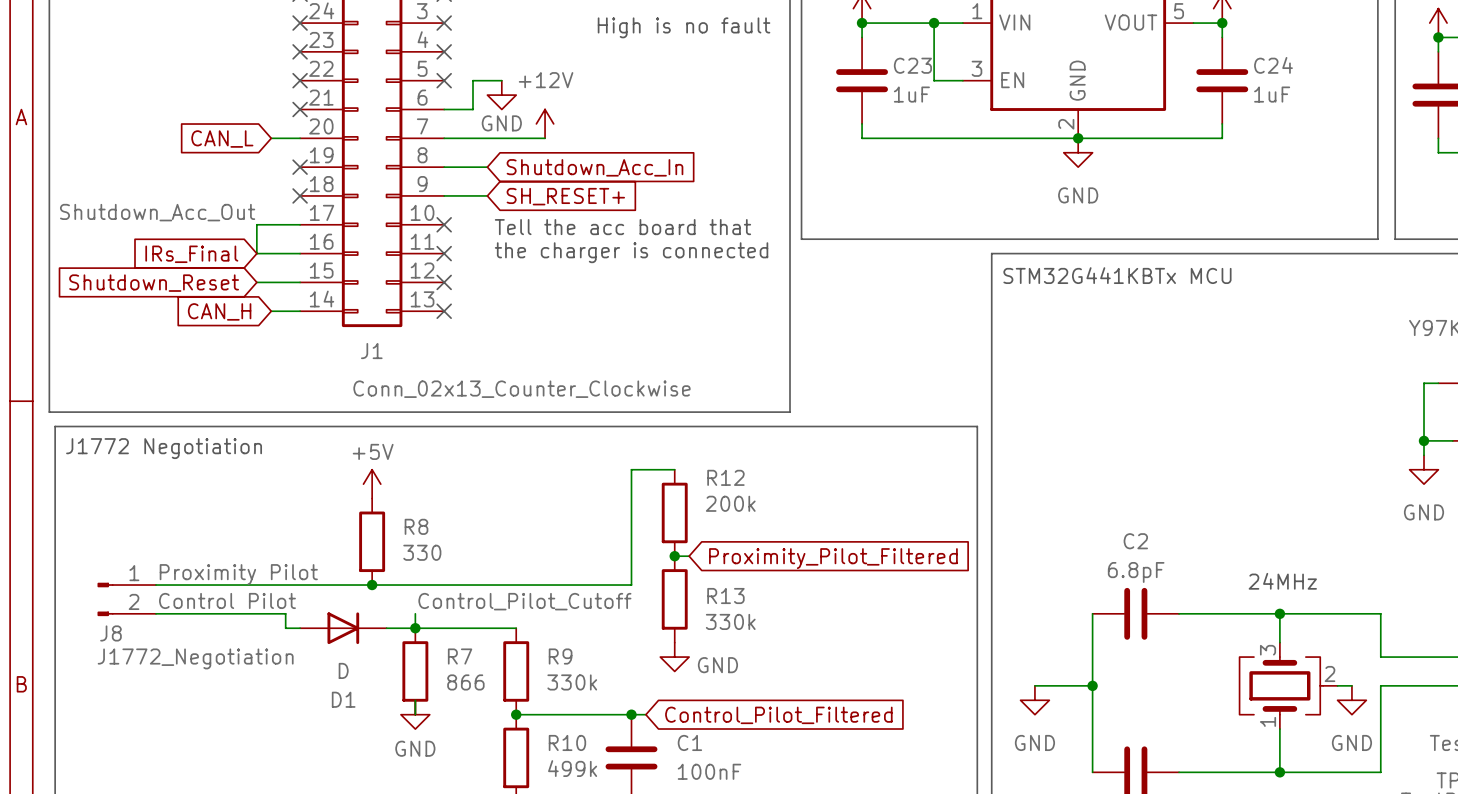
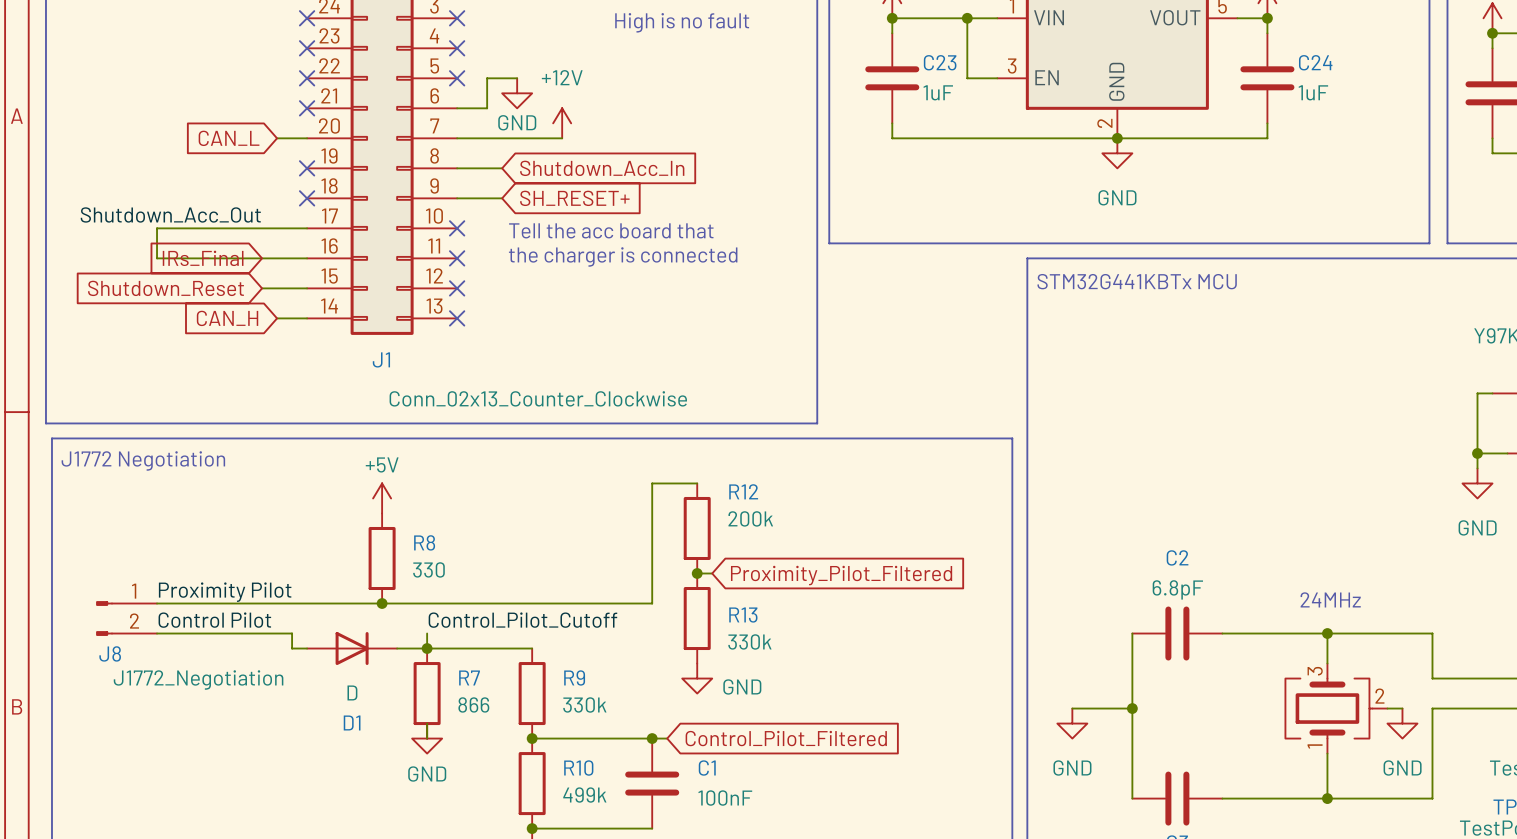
wire: (256, 224) (256, 253) -> (262, 228) (157, 228) (157, 258) (262, 258)

